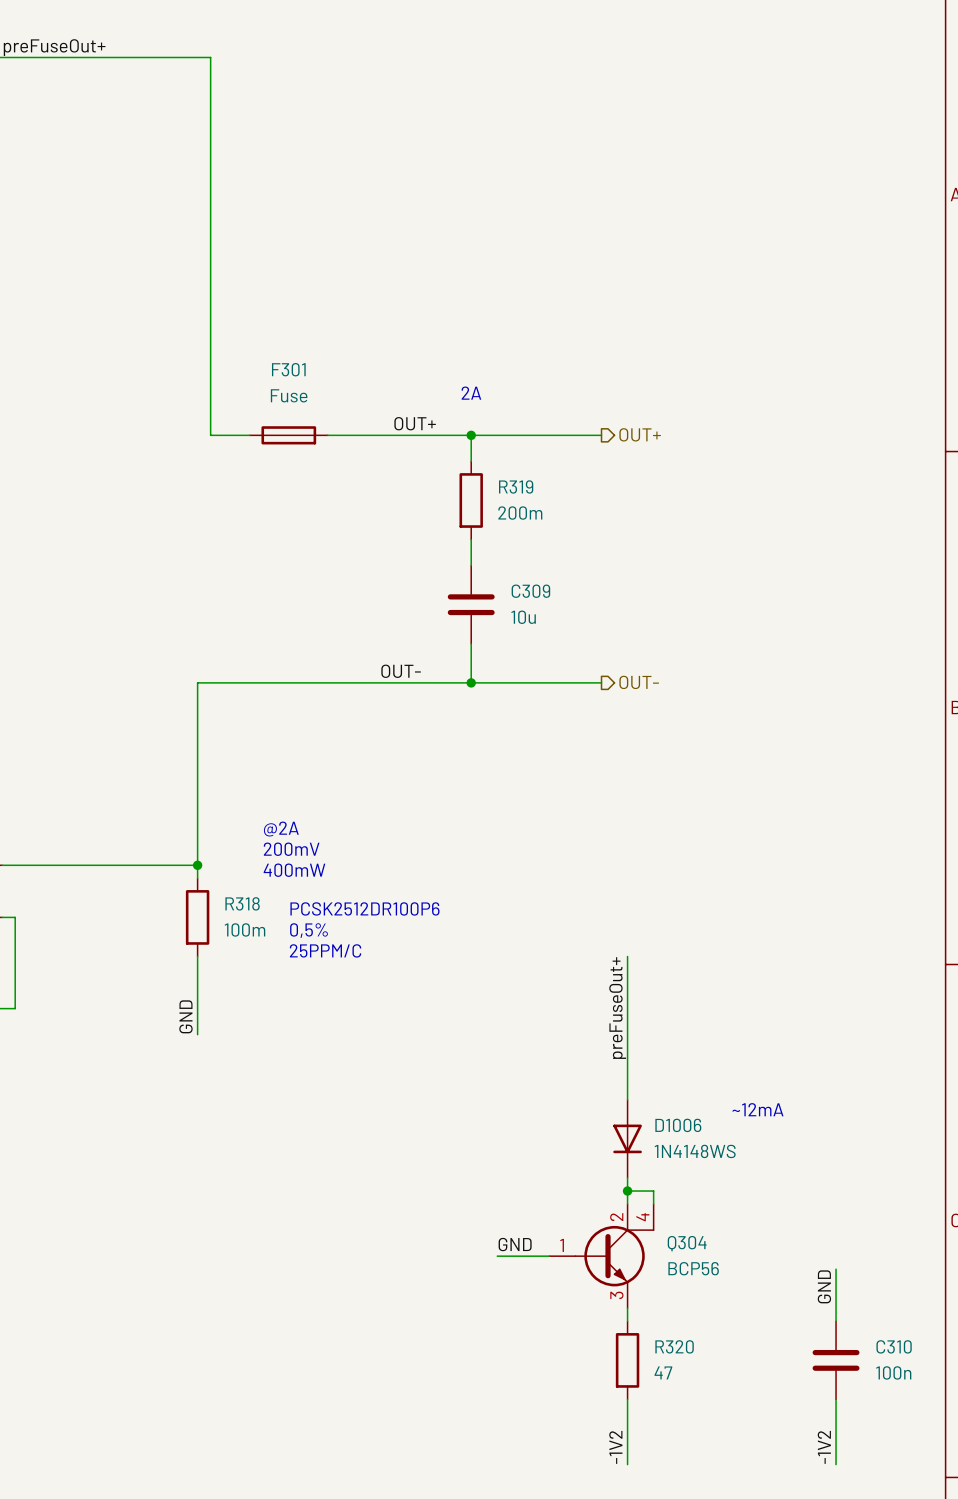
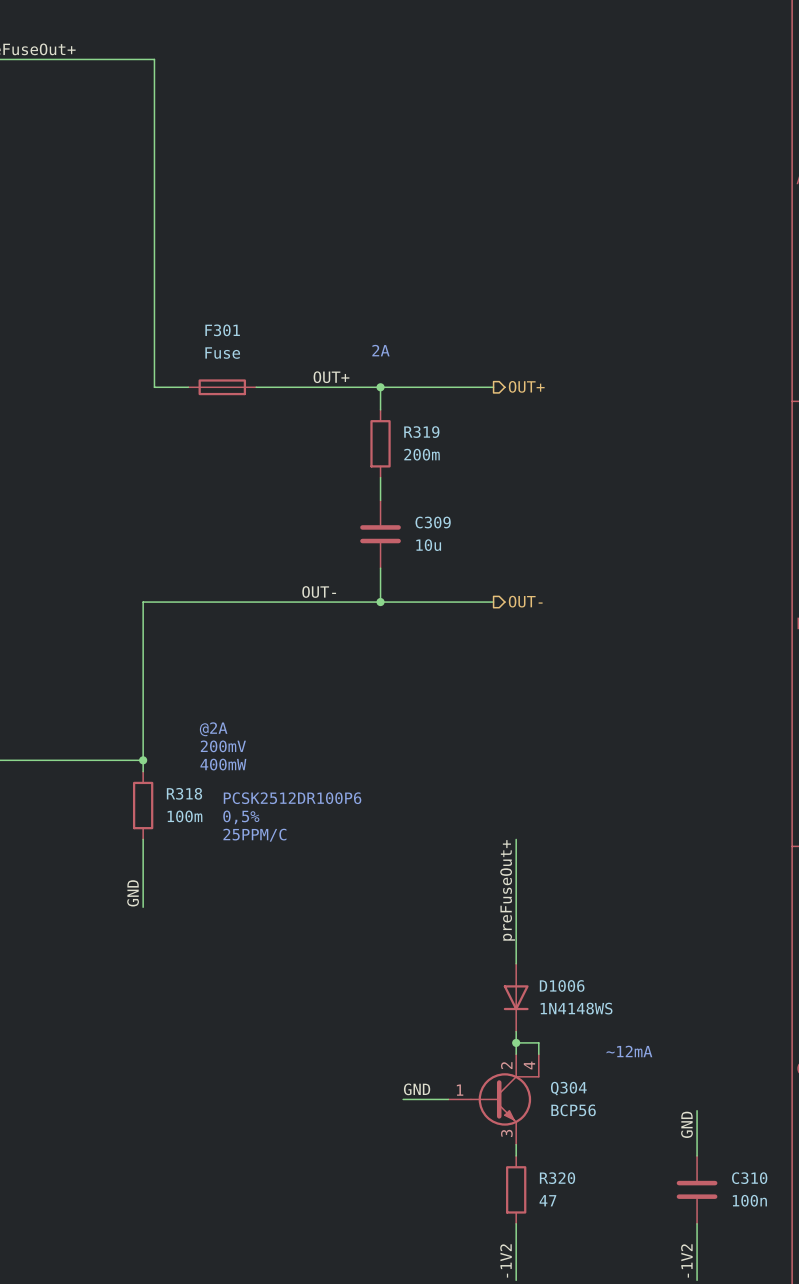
text position: ~12mA (757, 1109) -> ~12mA (629, 1051)

